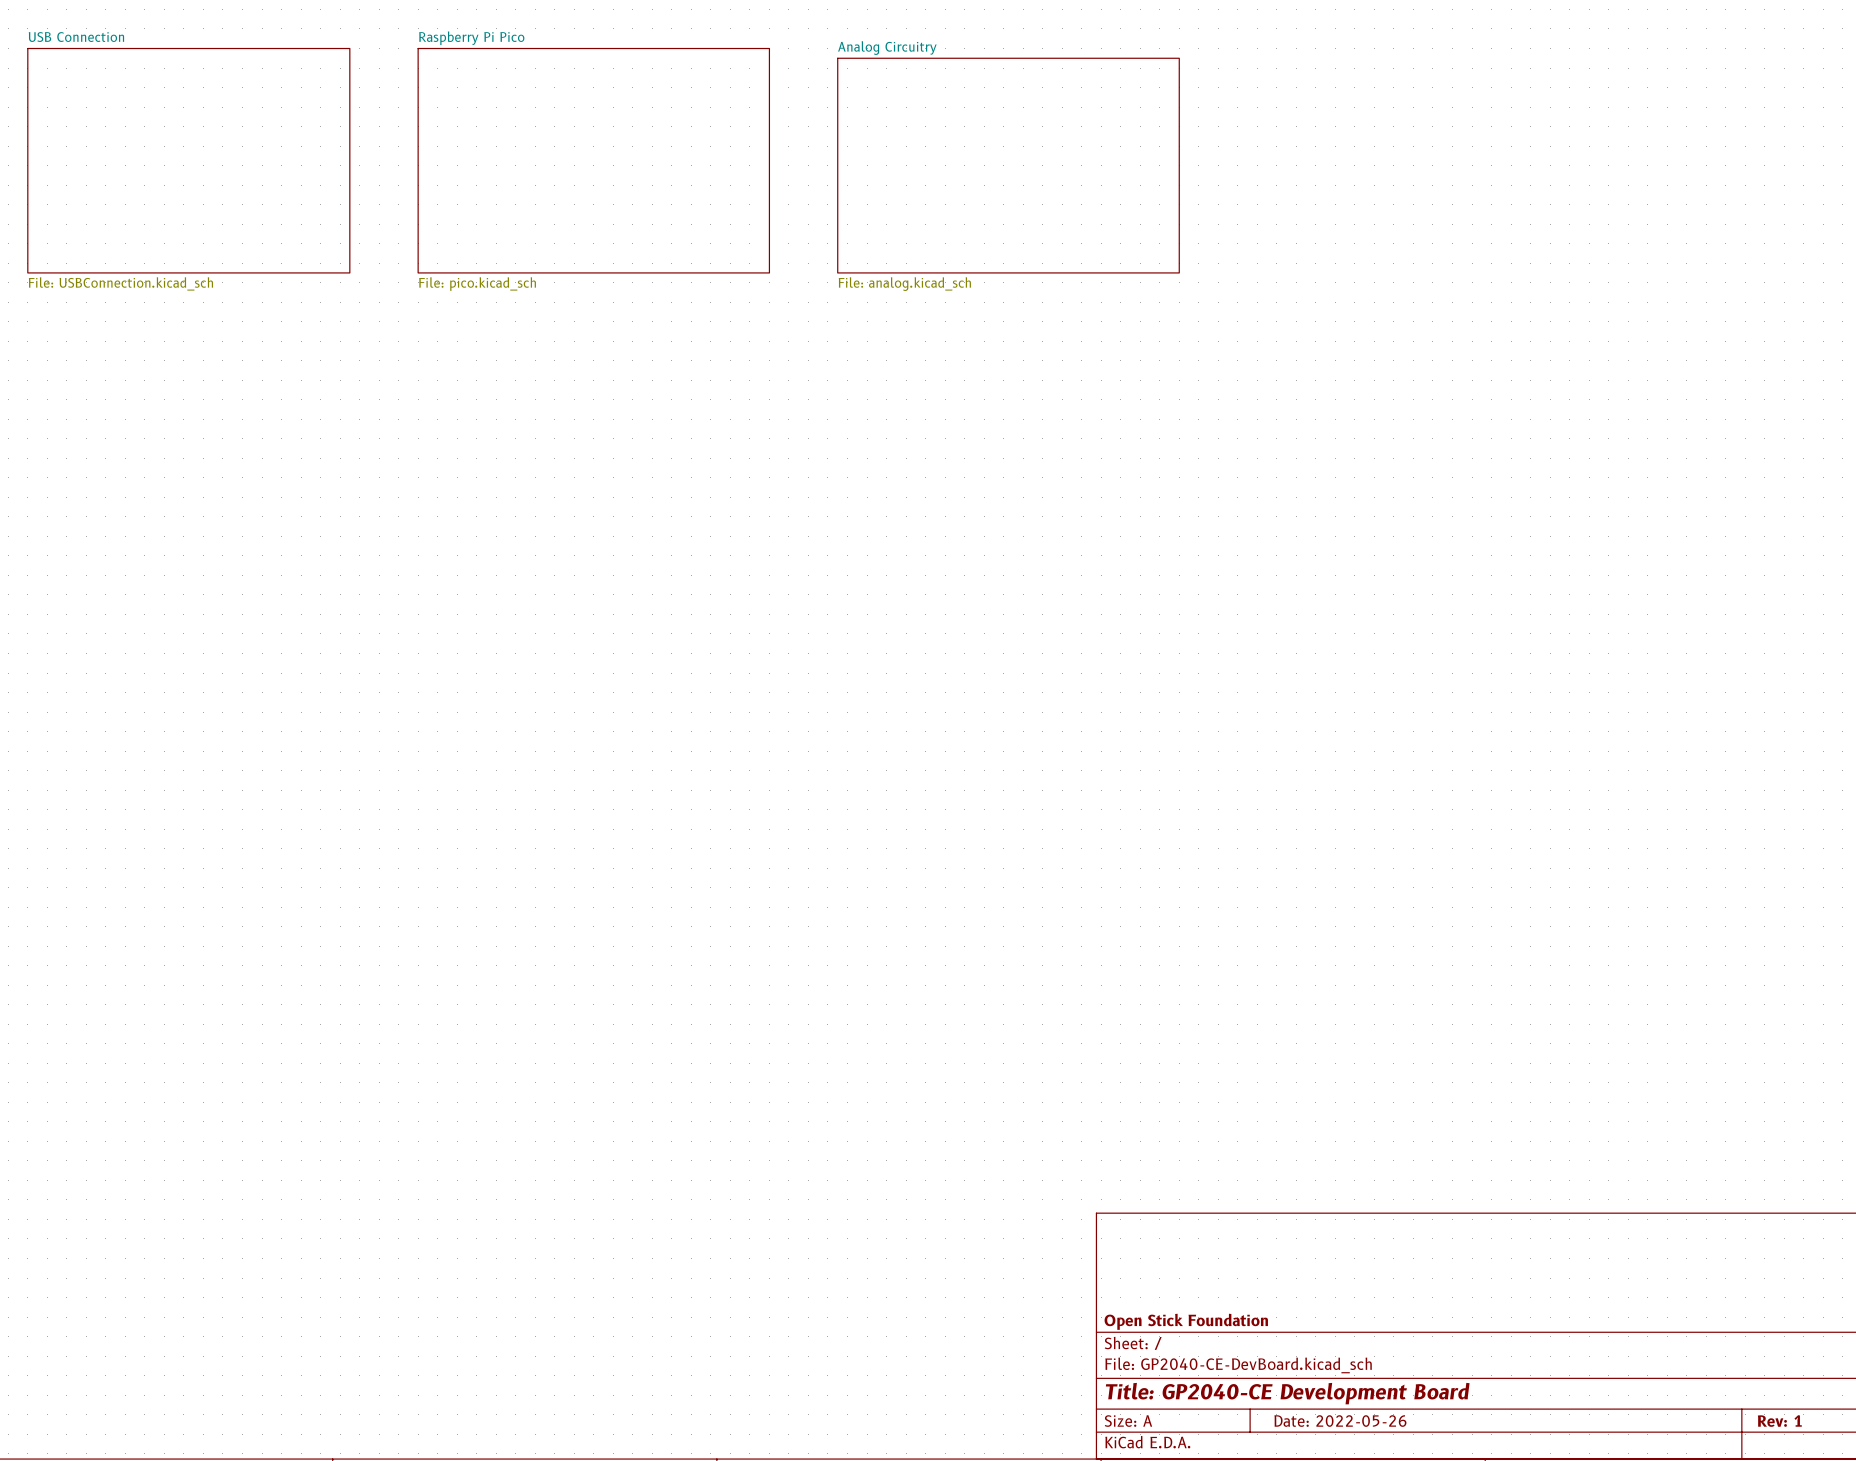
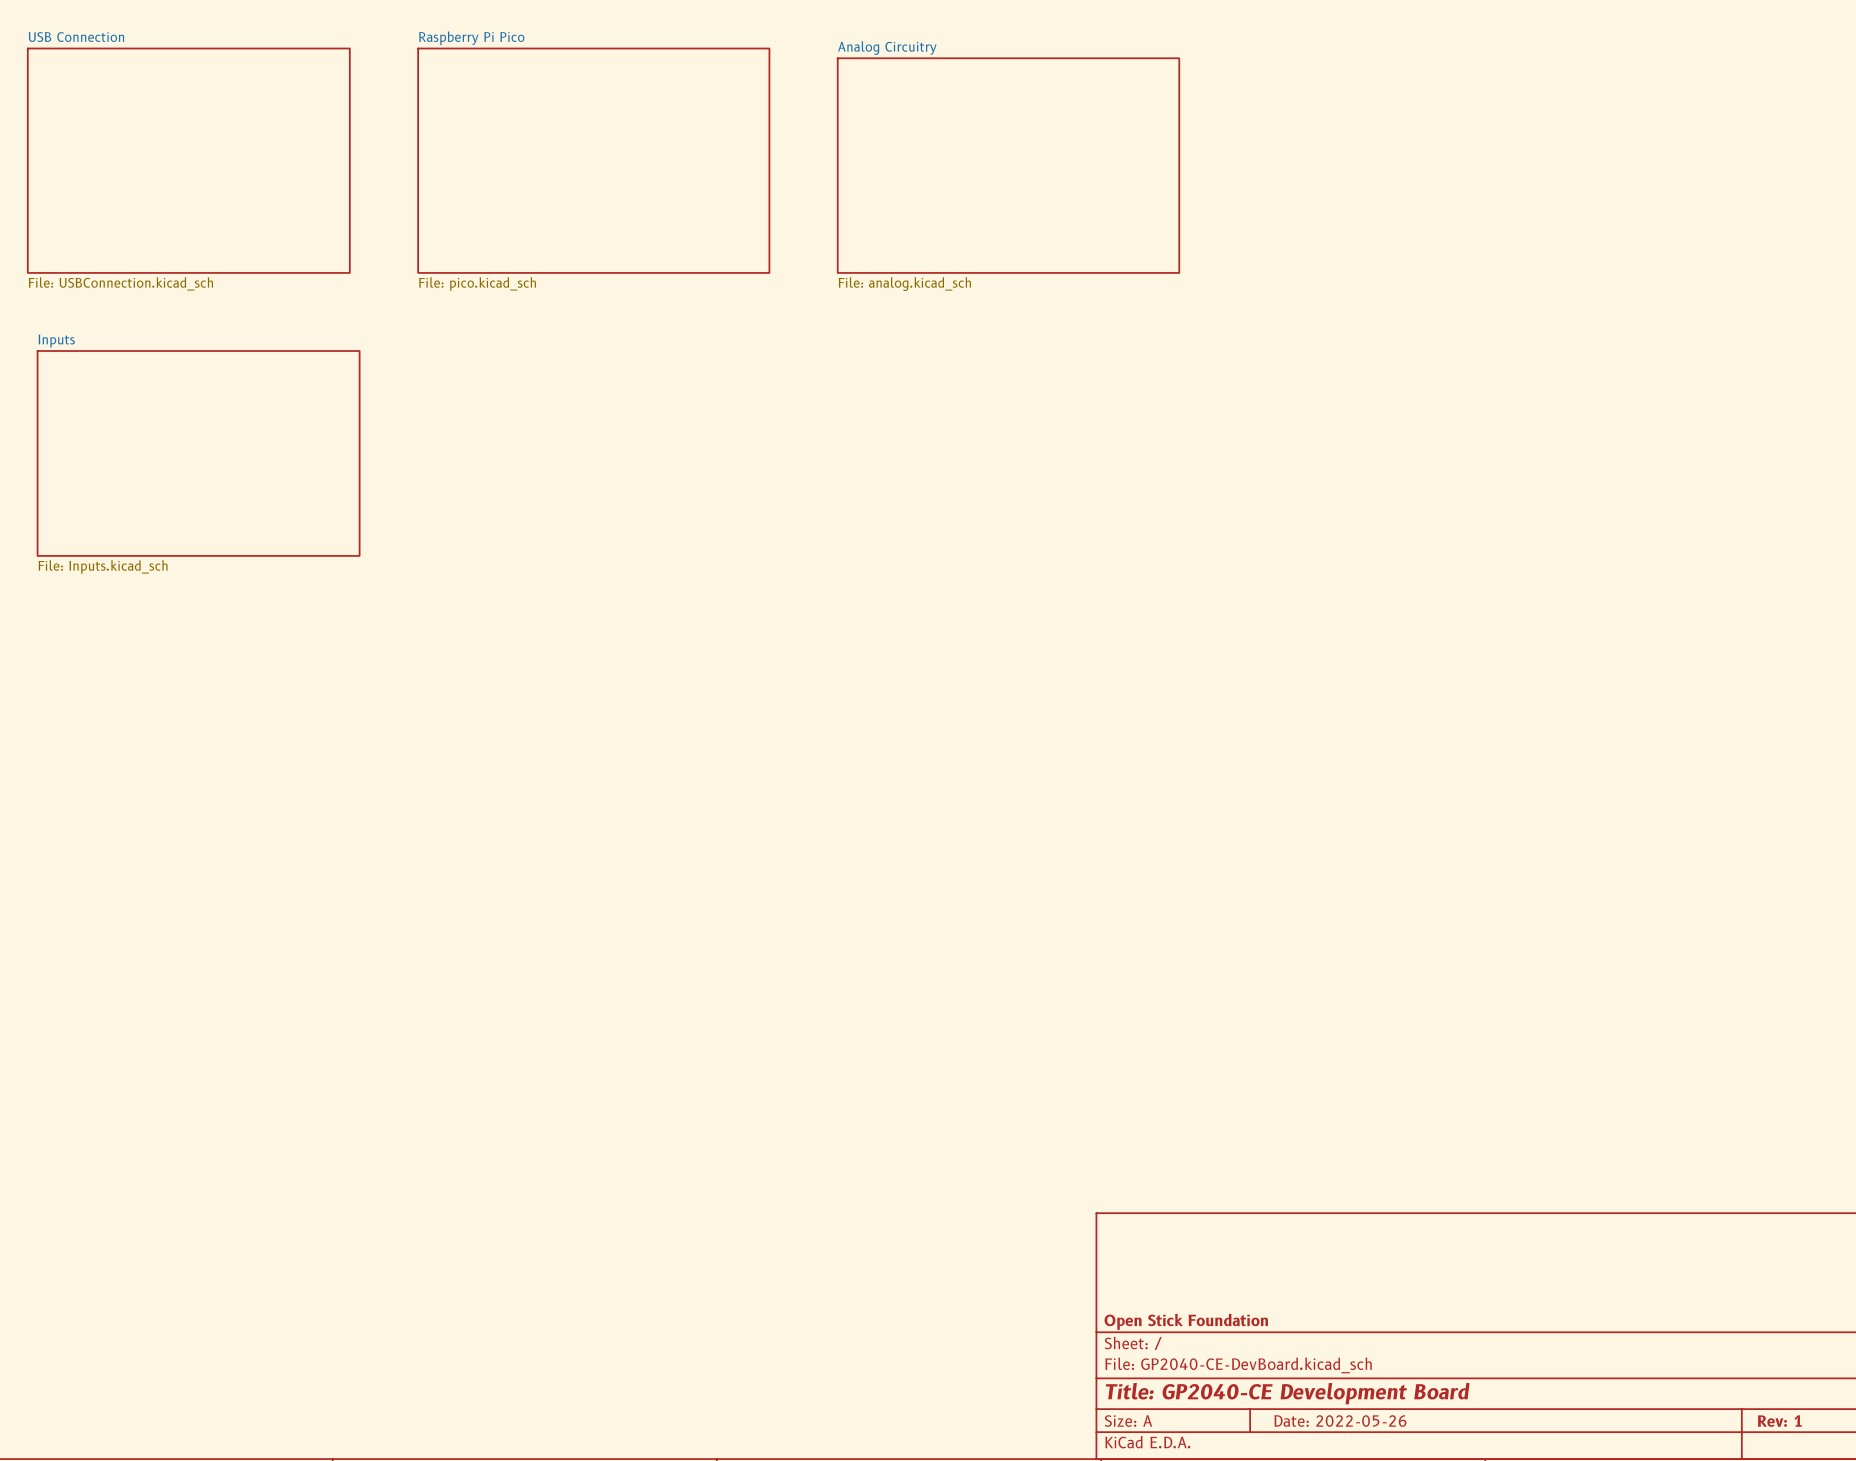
sheet Inputs: none -> File: Inputs.kicad_sch (198, 453)

